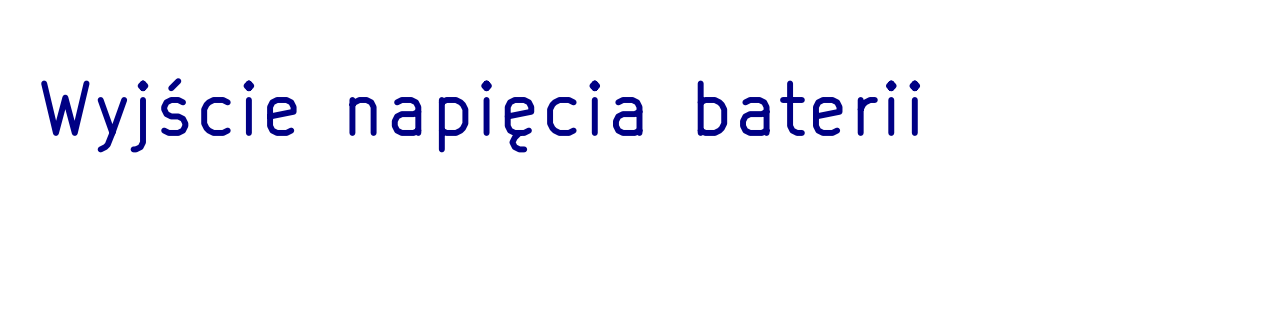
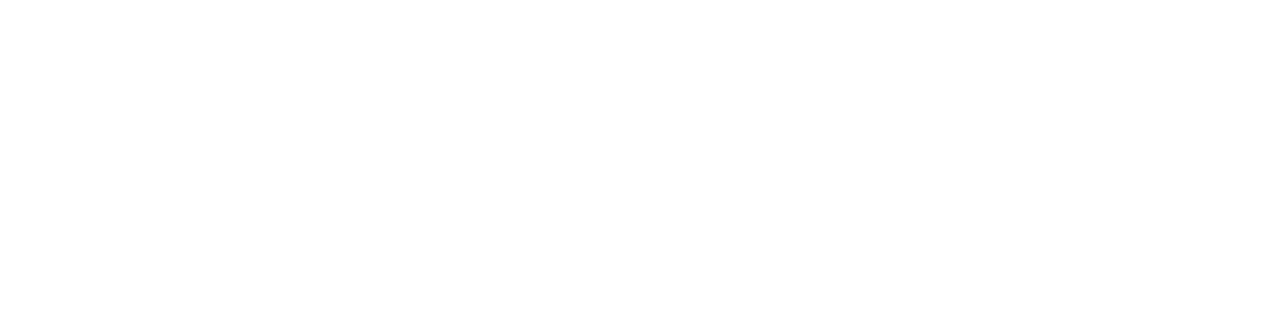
text: Wyjście napięcia baterii (480, 115) -> none

